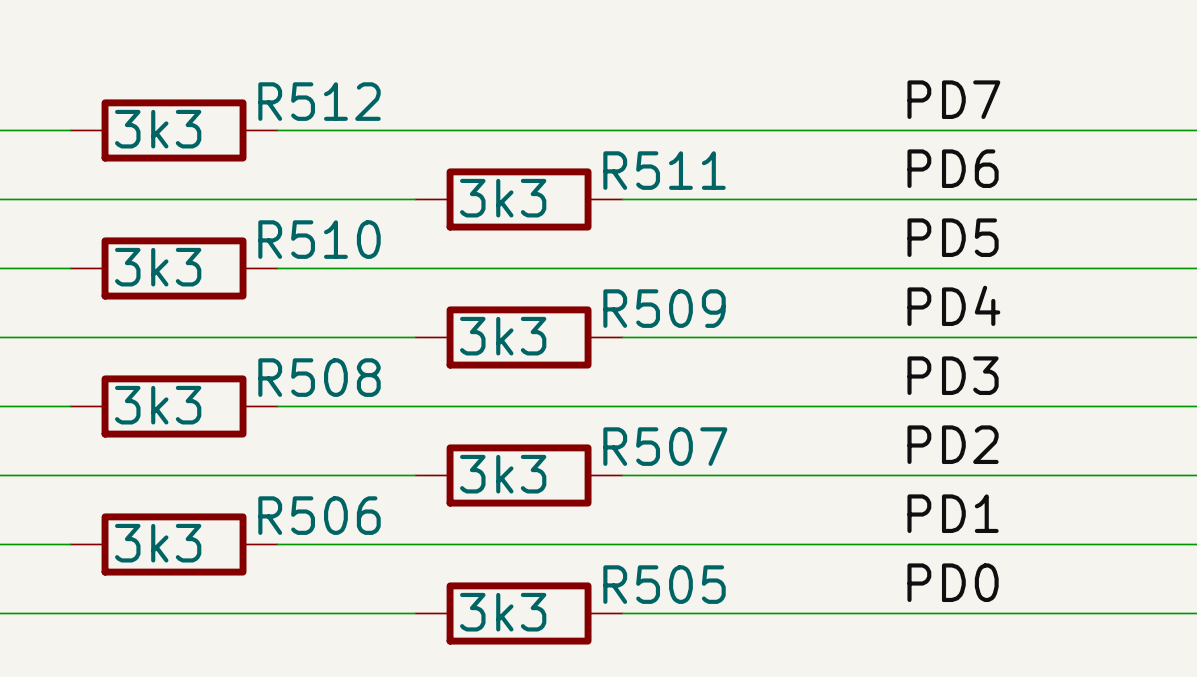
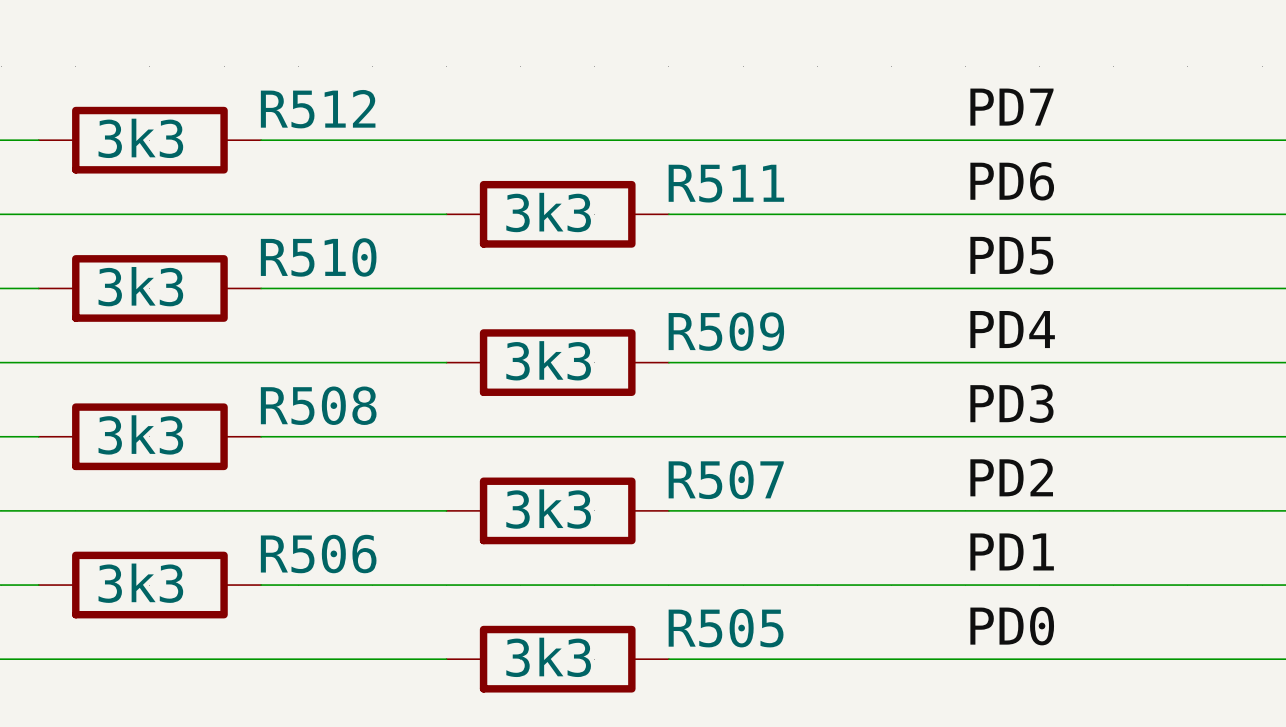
R512 position: (174, 130) -> (149, 140)
R510 position: (174, 268) -> (149, 288)
R508 position: (174, 406) -> (149, 436)
R506 position: (174, 544) -> (149, 585)

